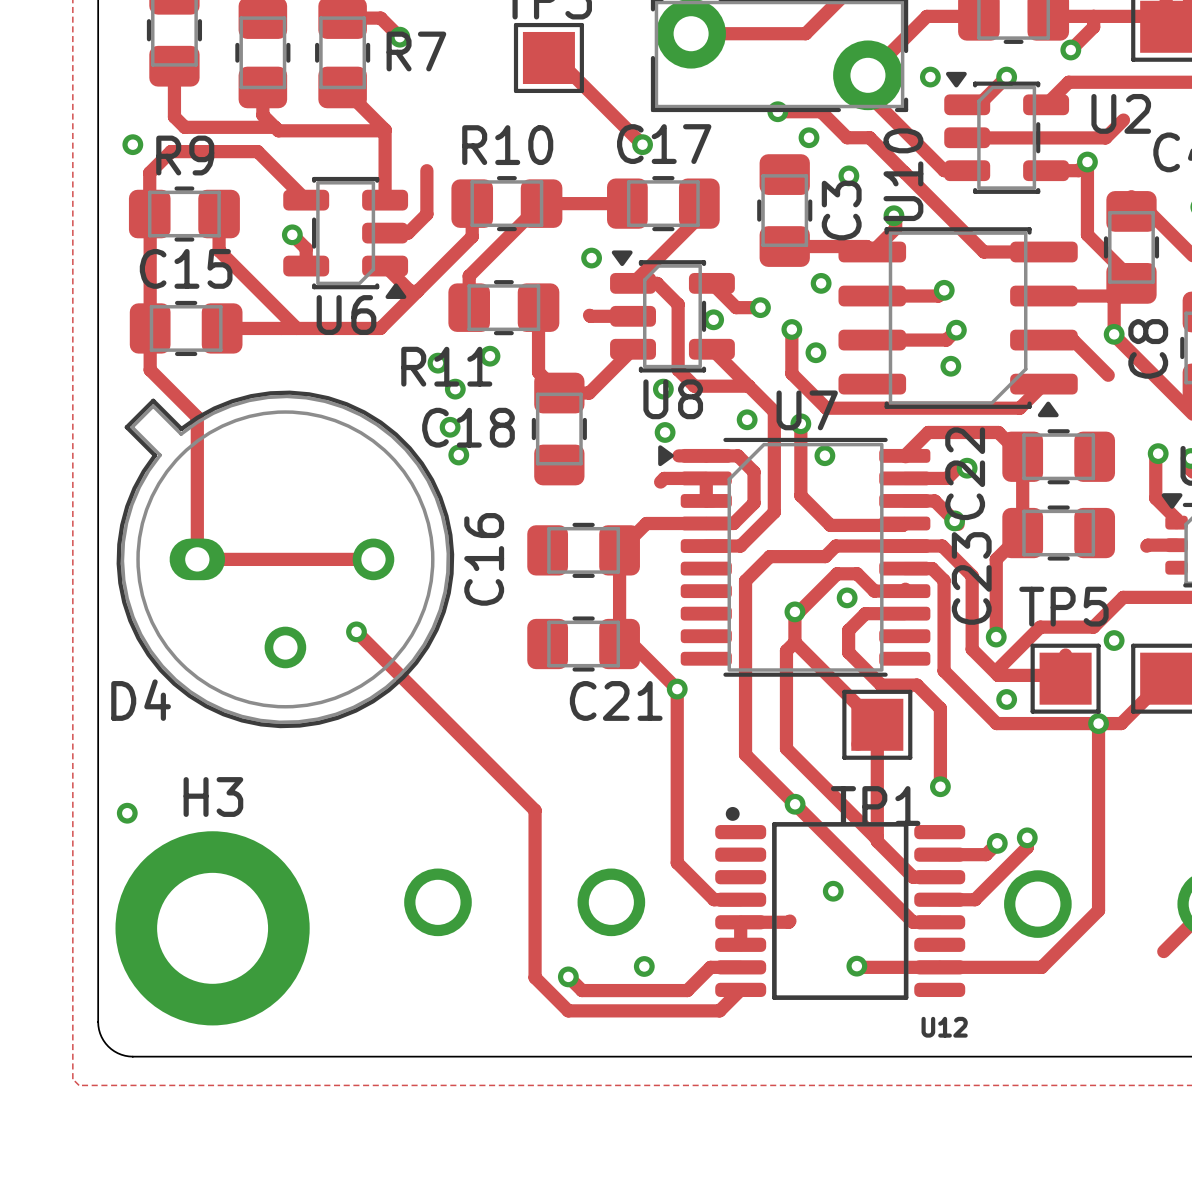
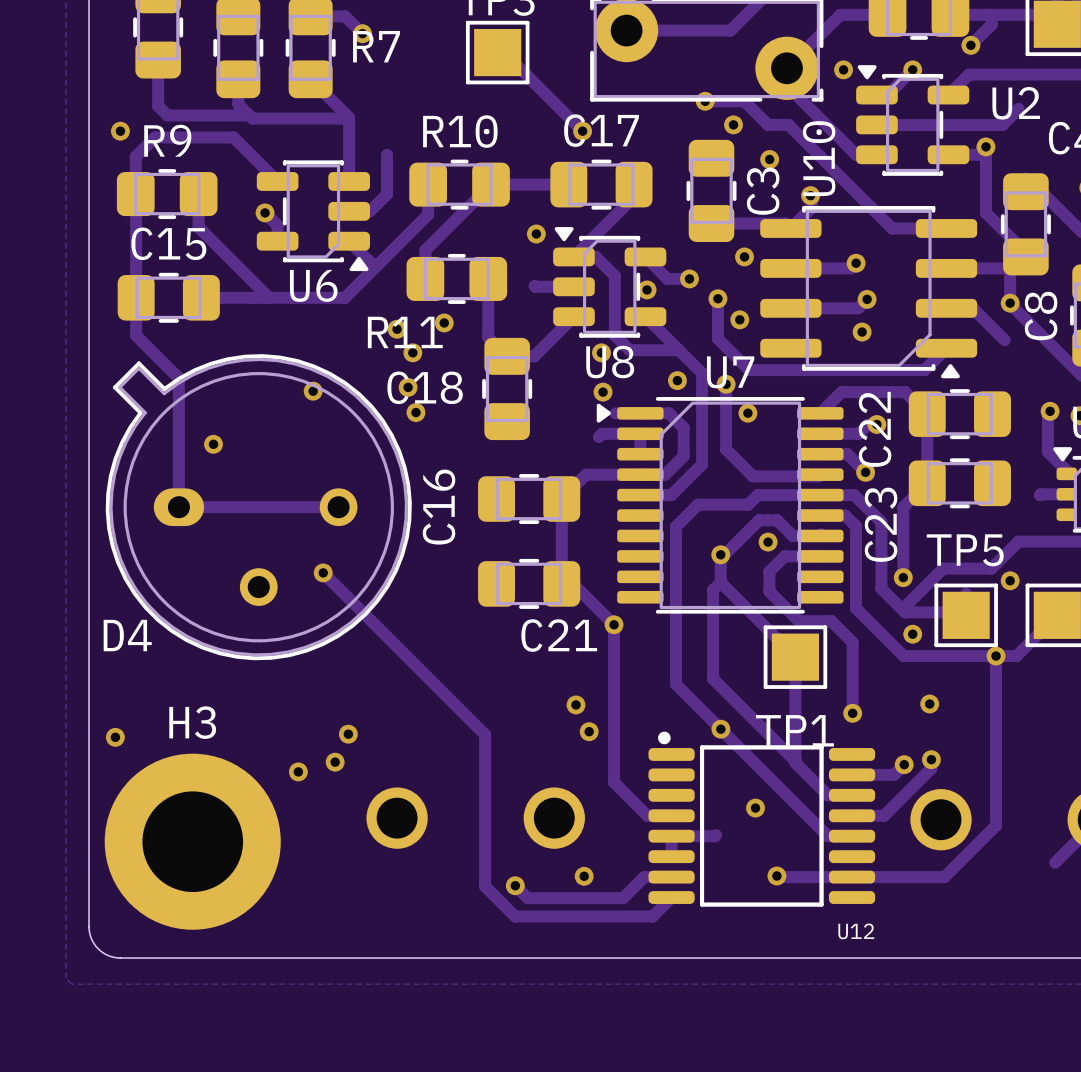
via: none -> (313, 391)
via: none -> (213, 444)
via: none -> (929, 704)
via: none -> (576, 704)
via: none -> (589, 731)
via: none -> (348, 734)
via: none -> (335, 762)
via: none -> (298, 771)

